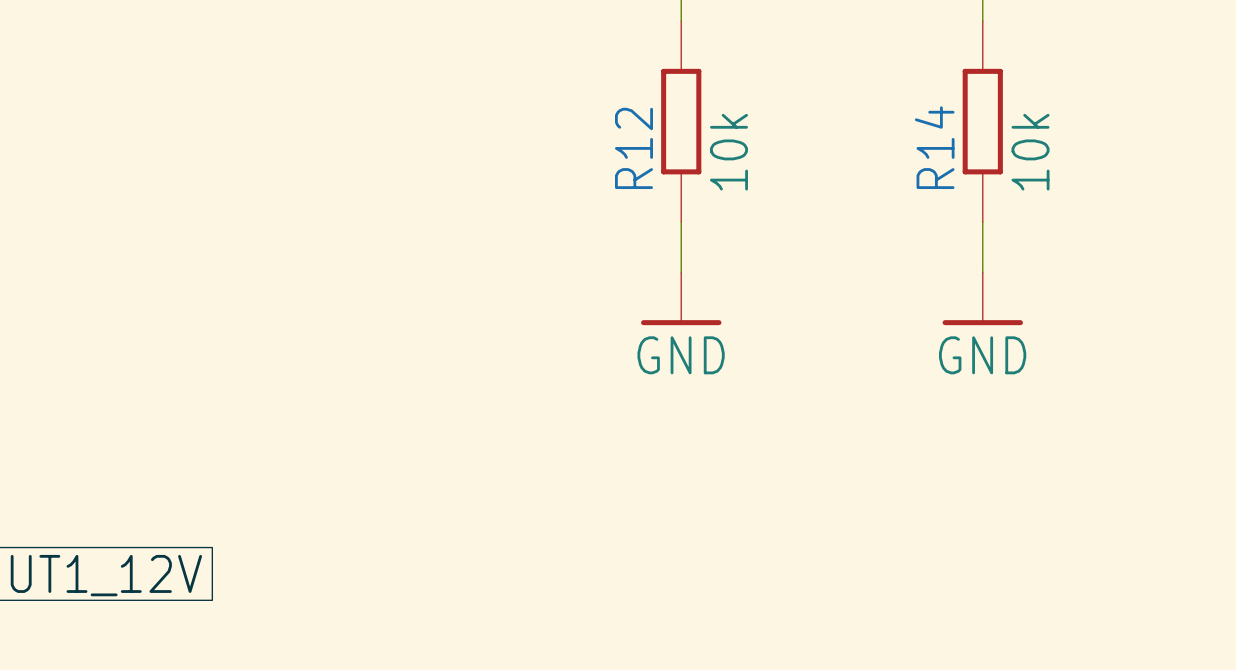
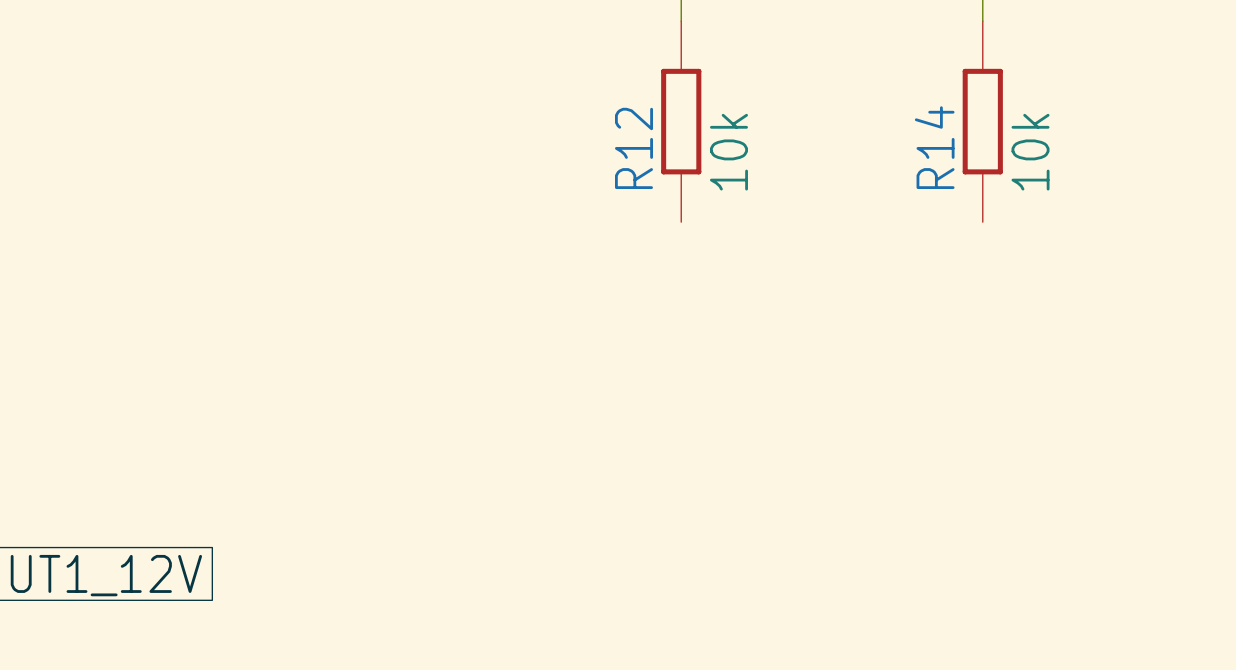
wire: (681, 222) (681, 272) -> none
wire: (982, 222) (982, 272) -> none
power symbol: GND (681, 298) -> none
power symbol: GND (982, 298) -> none

